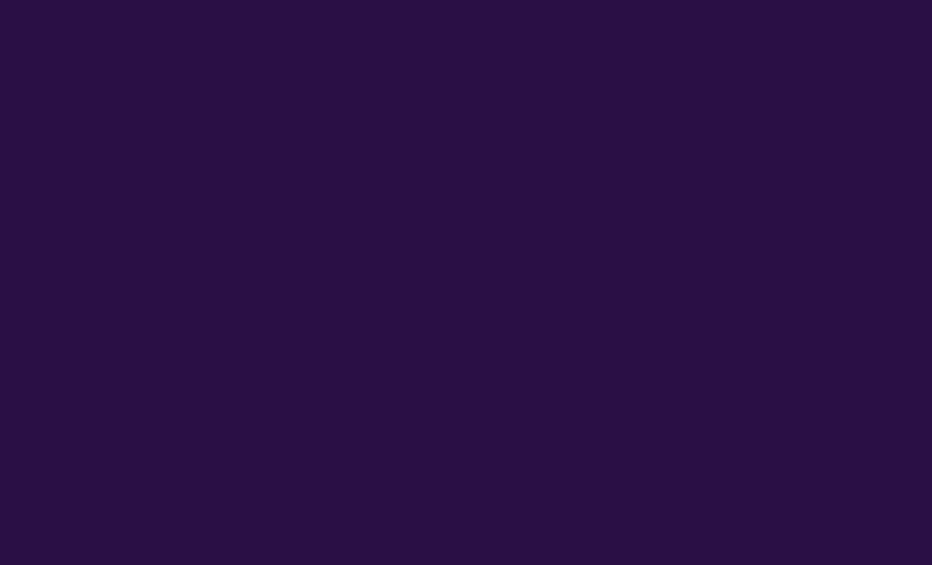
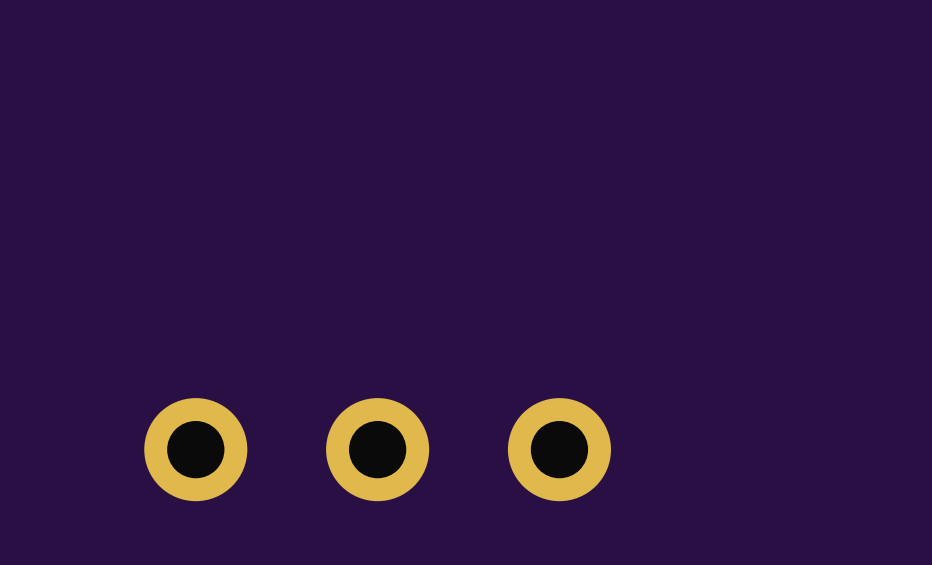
part: none -> (377, 449)

